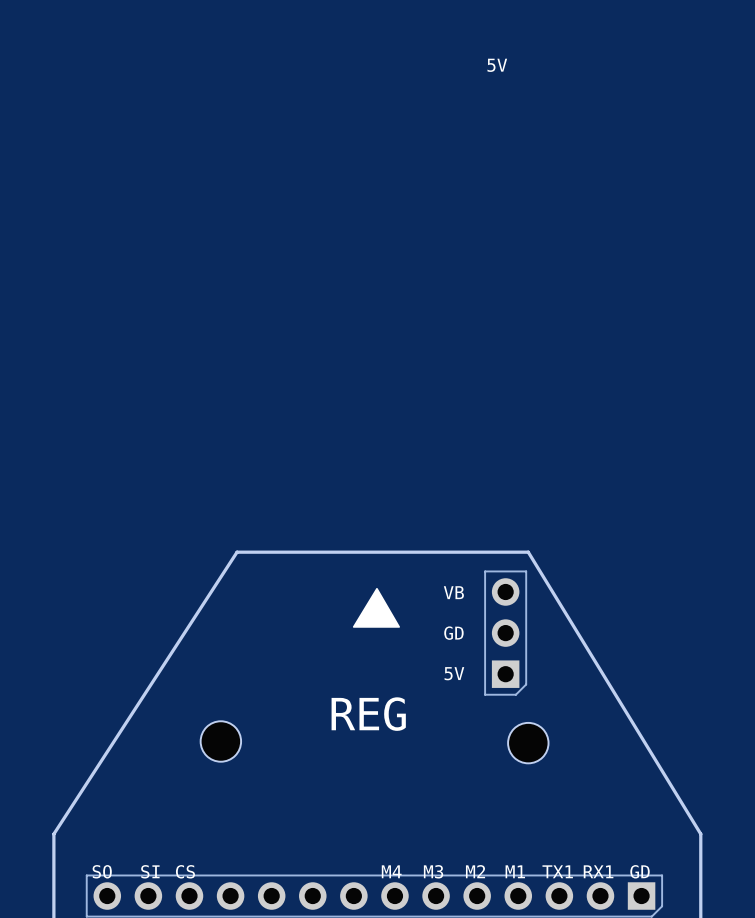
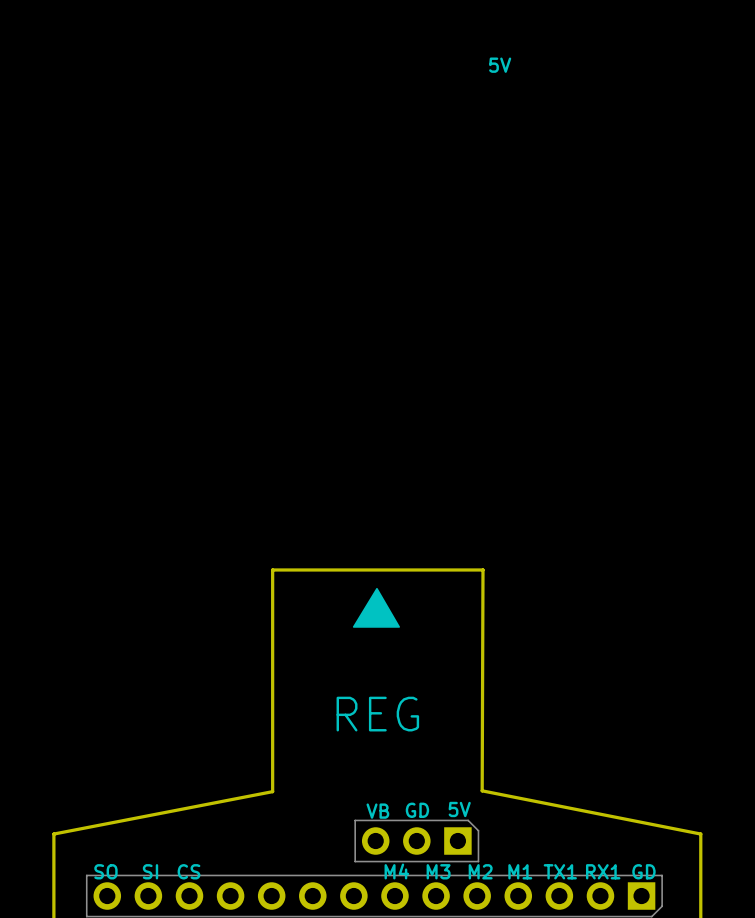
text position: VB (453, 592) -> VB (377, 811)
text position: GD (453, 633) -> GD (417, 810)
part rotation: 0° (505, 633) -> 90° counterclockwise (416, 841)
part position: (505, 633) -> (416, 841)
text position: 5V (454, 673) -> 5V (459, 809)
part: (220, 741) -> none
part: (528, 743) -> none
board edge: (53, 834) (237, 552) (528, 552) (700, 834) -> (53, 834) (272, 791) (272, 569) (482, 569) (482, 790) (700, 834)

